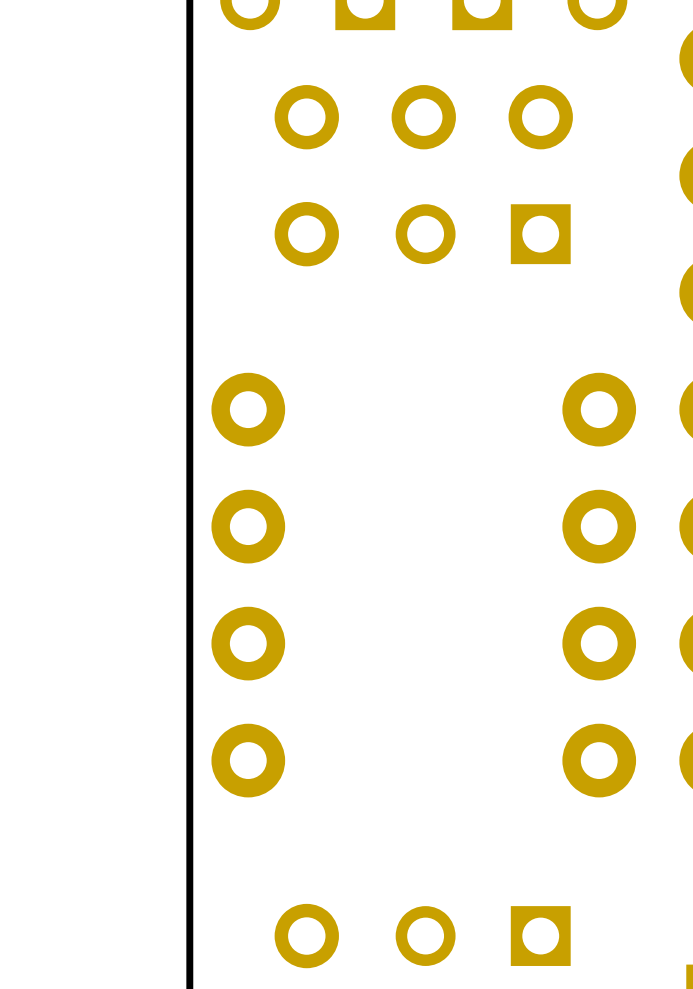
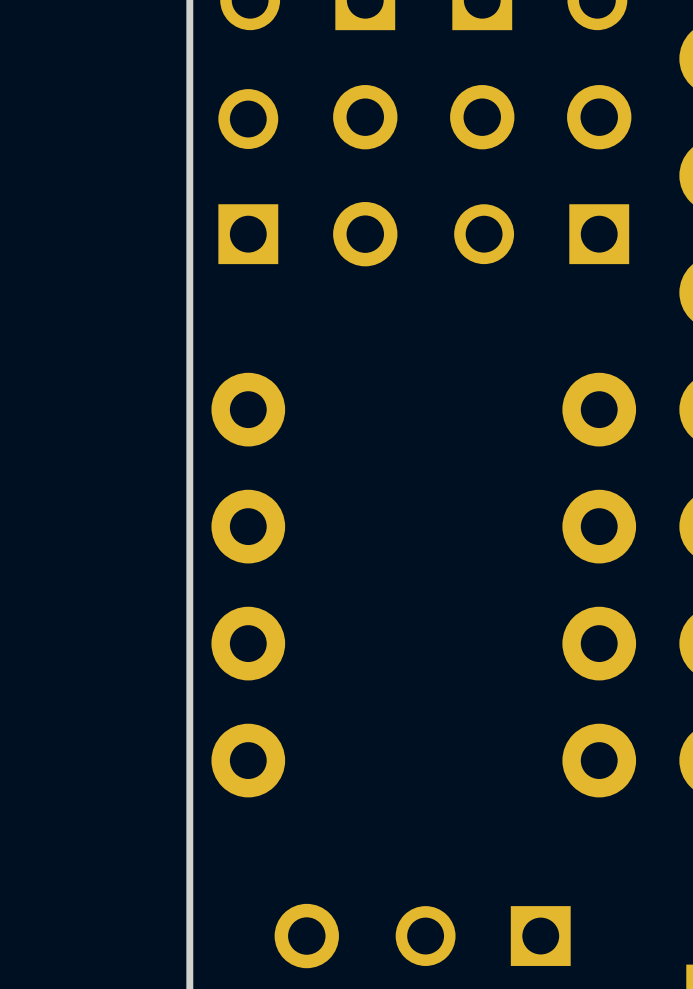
part position: (482, 117) -> (540, 117)
part position: (306, 175) -> (365, 175)
part: none -> (248, 176)
part position: (483, 234) -> (541, 234)

